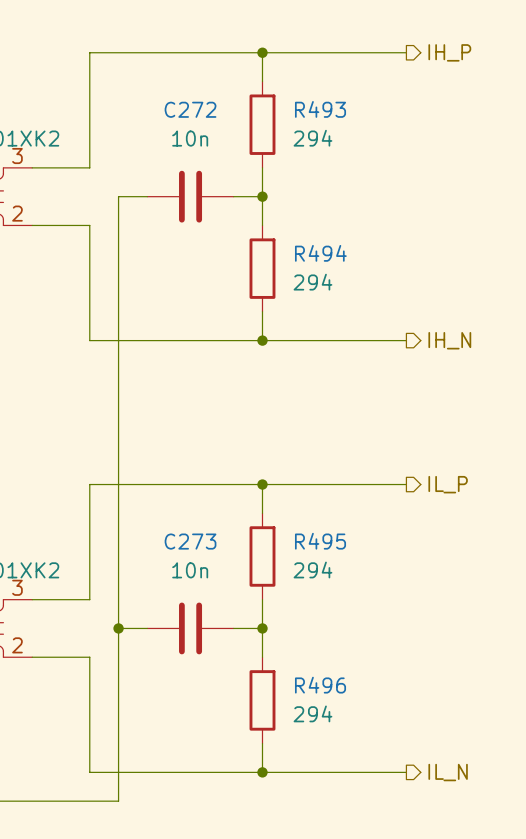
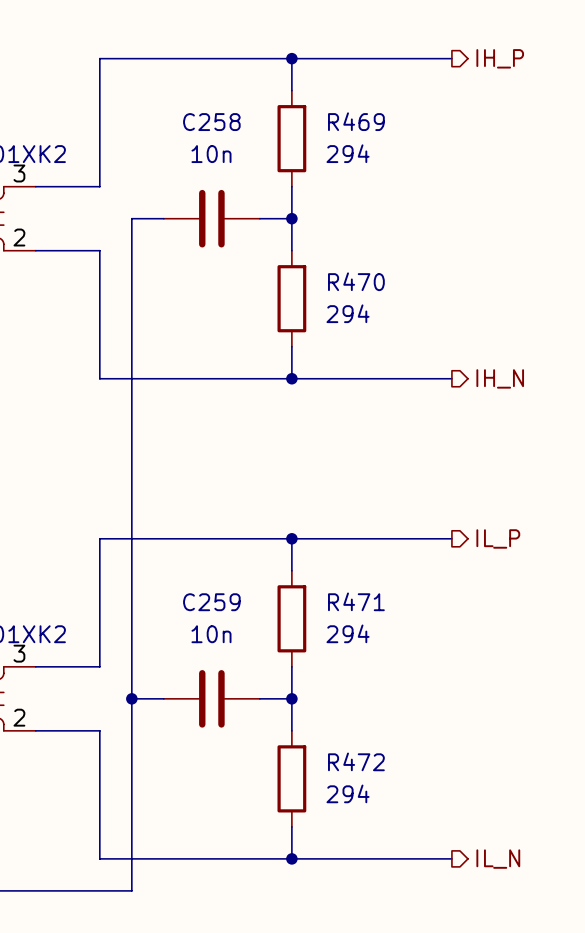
C272 name: C272 (190, 109) -> C258 (211, 122)
R493 name: R493 (320, 109) -> R469 (356, 121)
R494 name: R494 (320, 253) -> R470 (356, 281)
C273 name: C273 (190, 541) -> C259 (211, 602)
R495 name: R495 (320, 541) -> R471 (356, 601)
R496 name: R496 (320, 685) -> R472 (356, 761)

